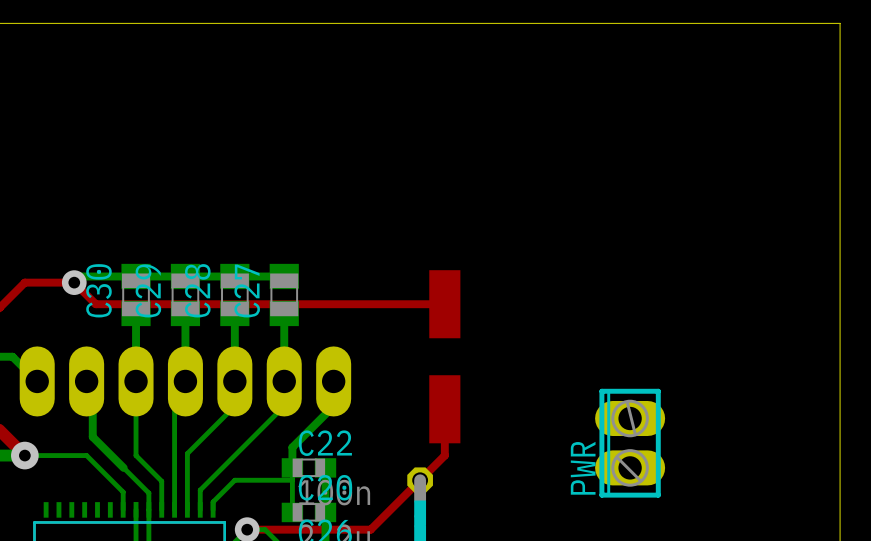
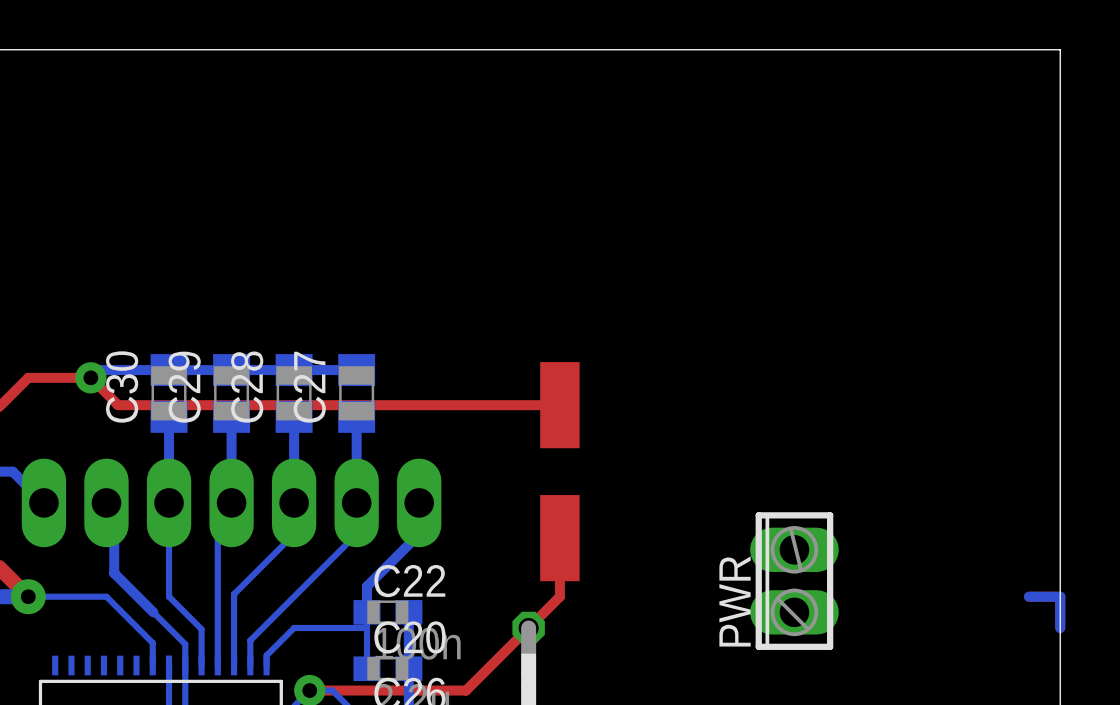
bottom track: none -> (1028, 596) (1060, 596) (1060, 628)

